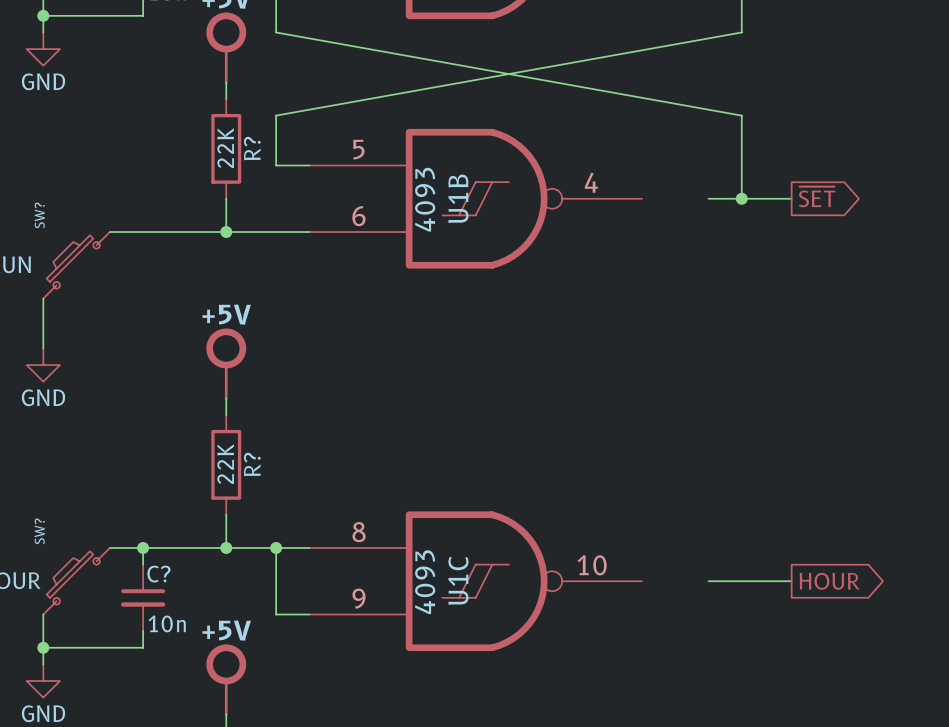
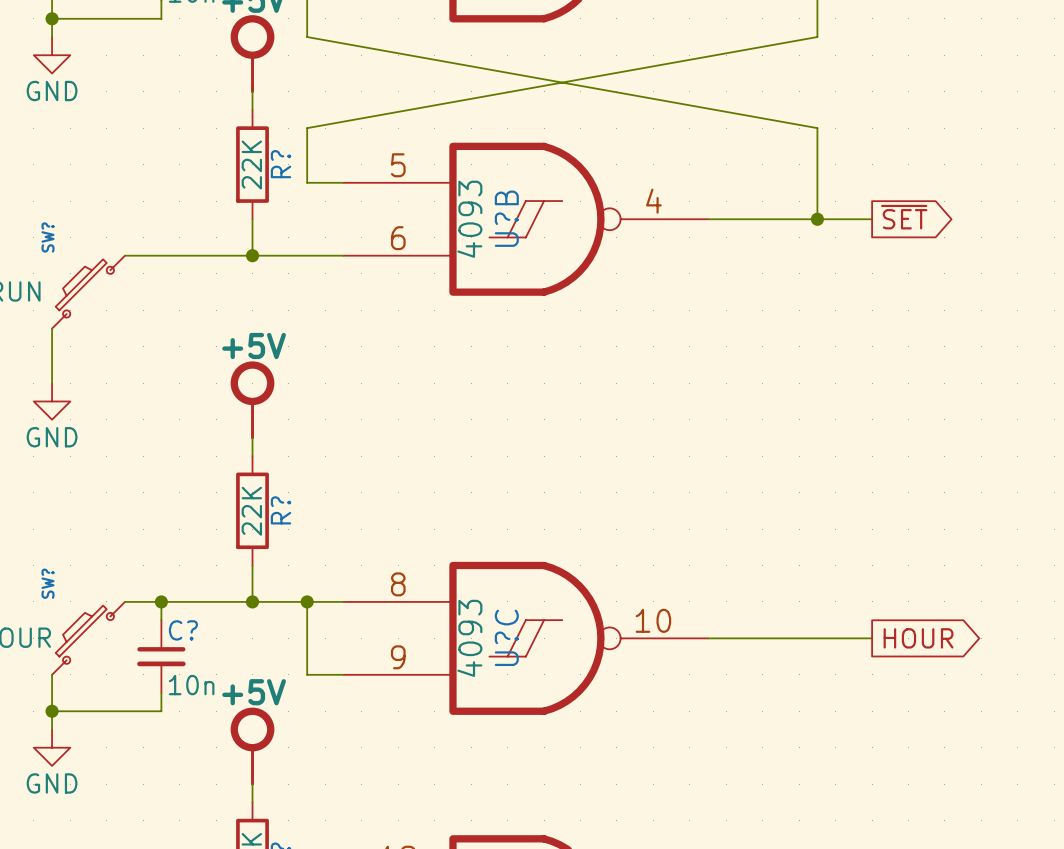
U1B name: U1B (458, 198) -> U?B (506, 218)
wire: none -> (708, 219) (780, 219)
U1C name: U1C (458, 580) -> U?C (506, 637)
wire: none -> (708, 638) (780, 638)

